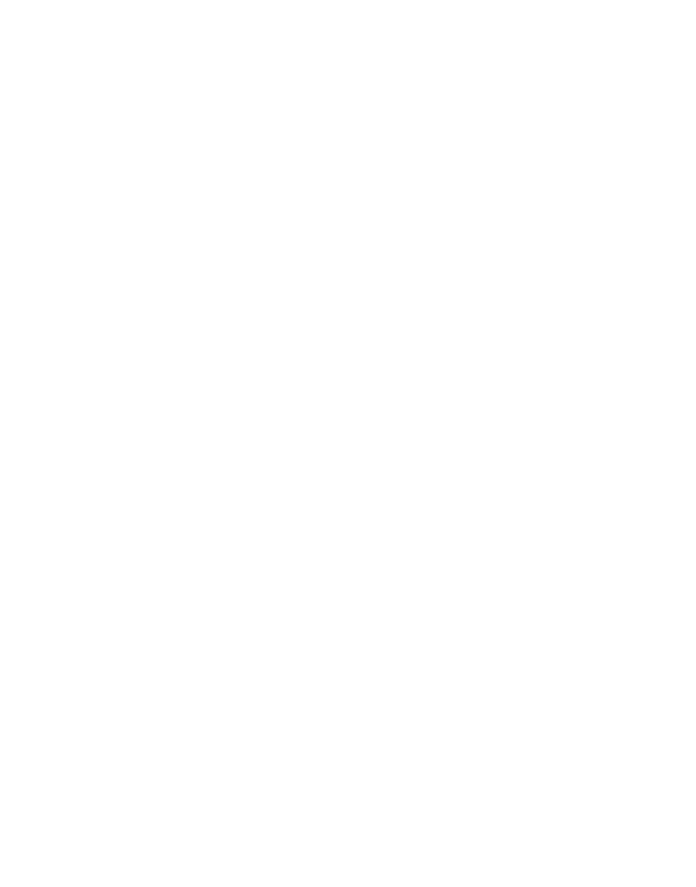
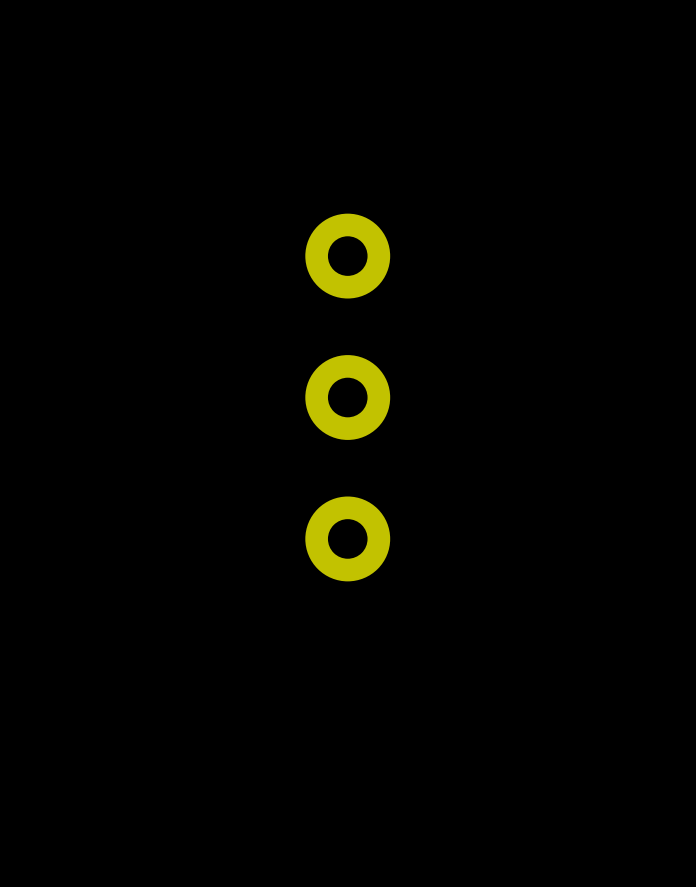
part: none -> (347, 397)

